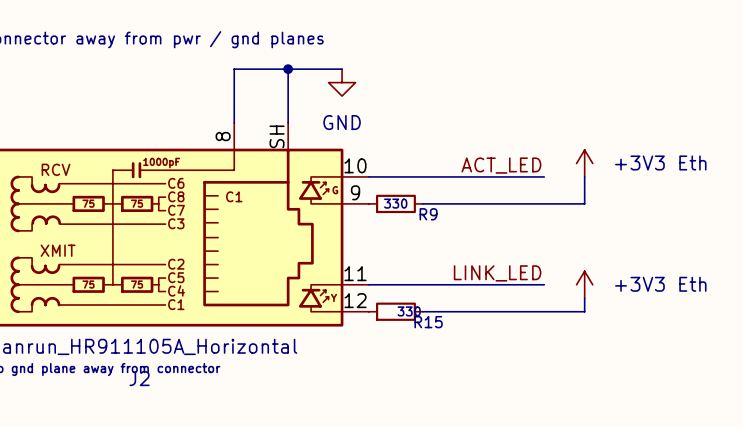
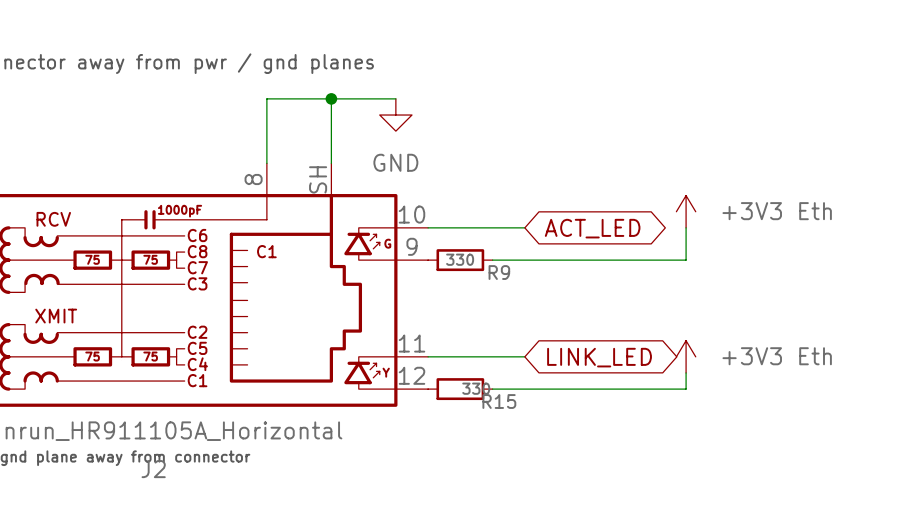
label: ACT_LED (501, 165) -> none
wire: (449, 176) (544, 176) -> none
global label: none -> ACT_LED (592, 228)
label: LINK_LED (497, 273) -> none
wire: (449, 284) (544, 284) -> none
global label: none -> LINK_LED (599, 357)

